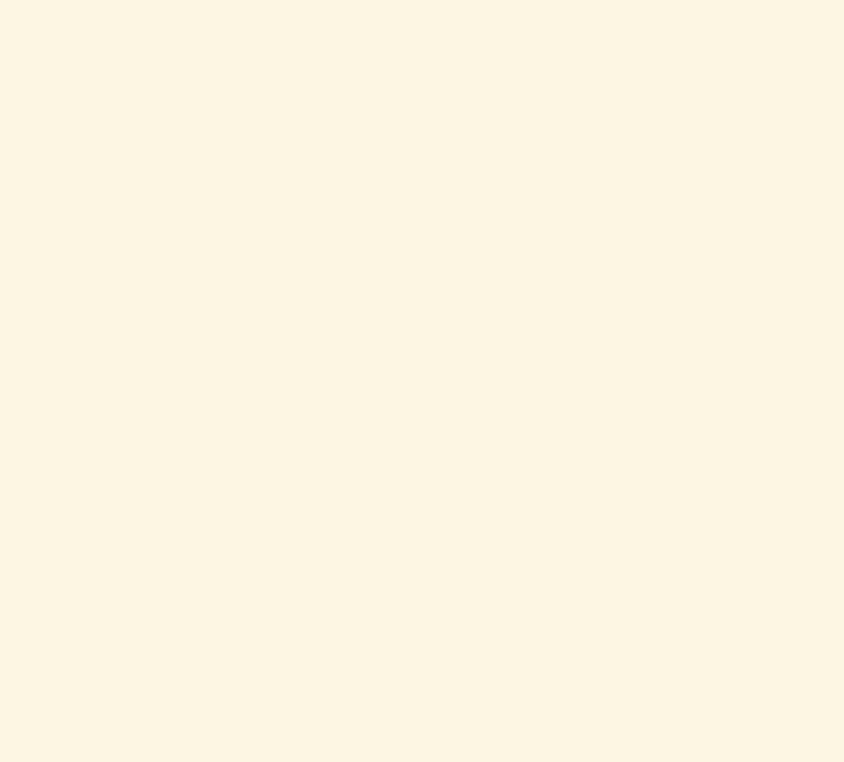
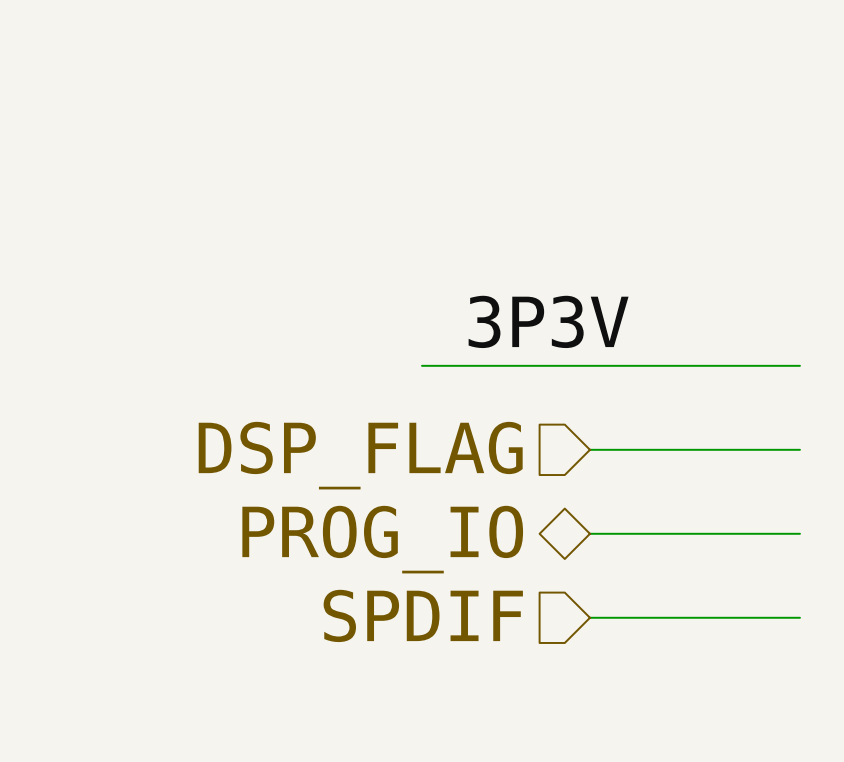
label: none -> 3P3V (548, 321)
wire: none -> (422, 365) (799, 365)
wire: none -> (589, 449) (799, 449)
hierarchical label: none -> DSP_FLAG (360, 455)
wire: none -> (589, 533) (799, 533)
hierarchical label: none -> PROG_IO (382, 539)
hierarchical label: none -> SPDIF (423, 615)
wire: none -> (589, 617) (799, 617)

